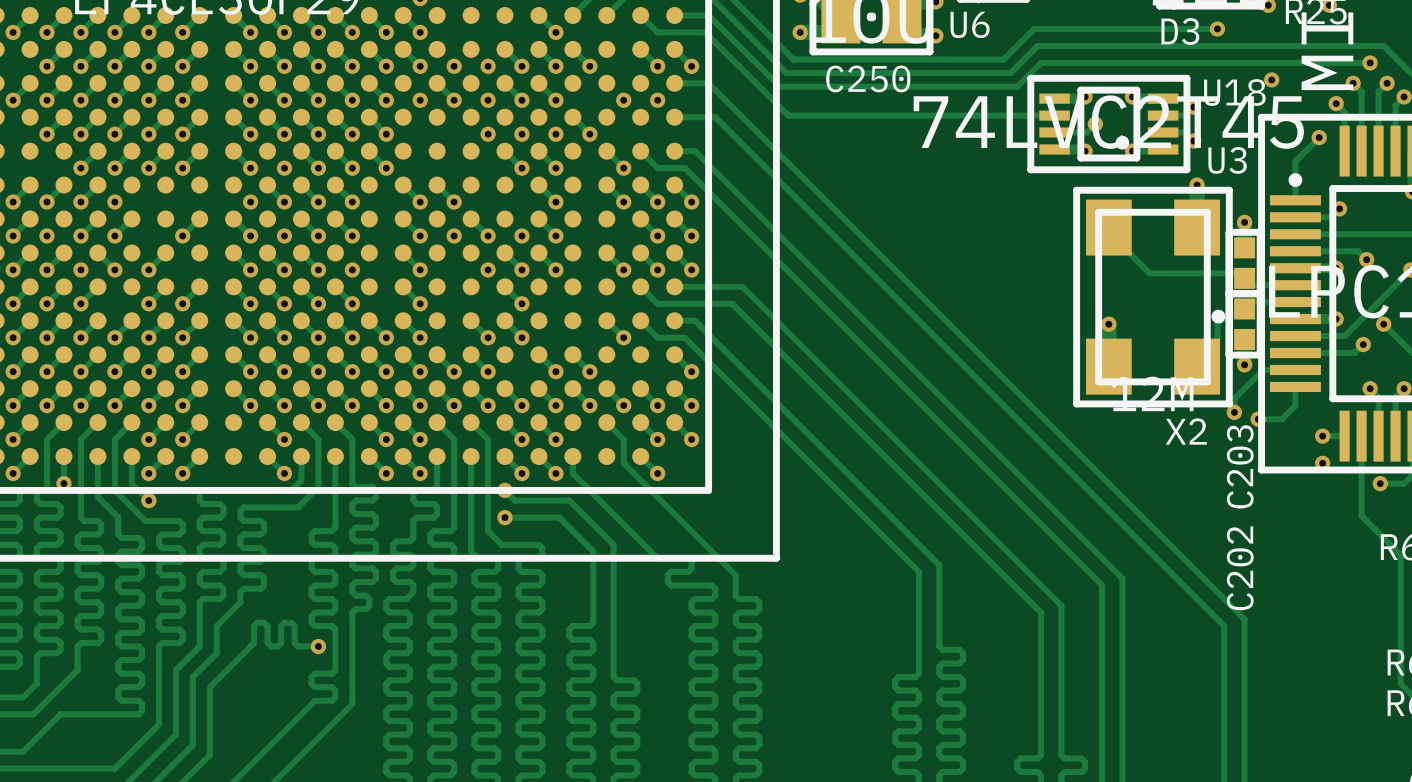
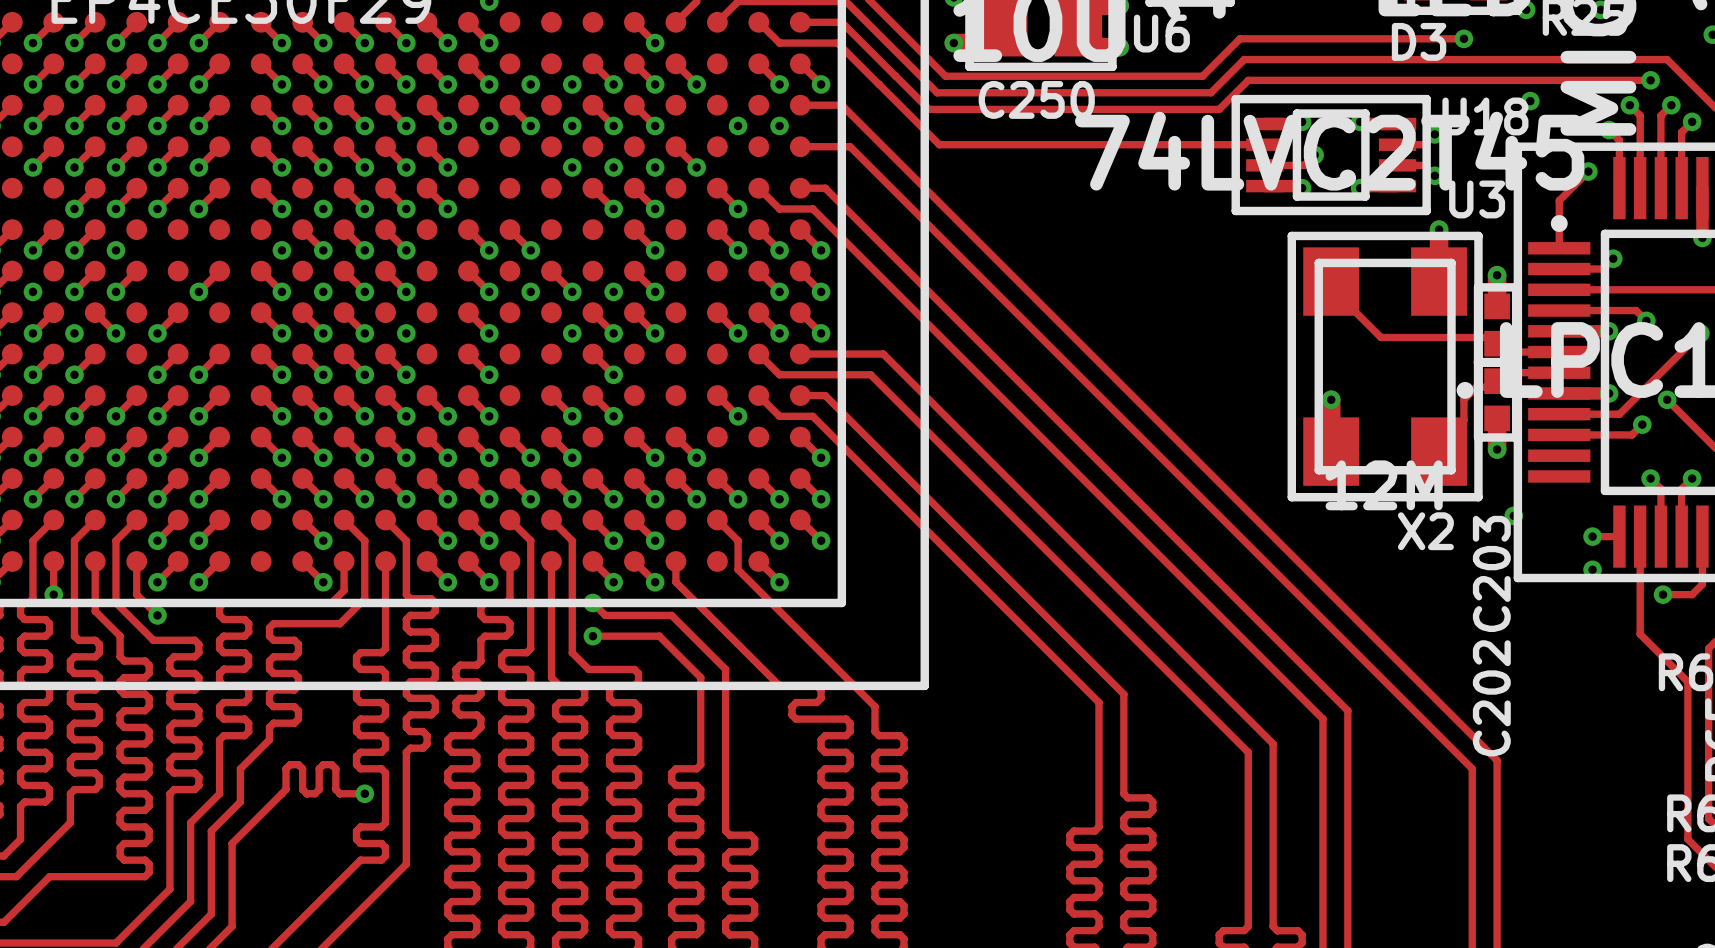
track: (1295, 369) (1263, 369) (1234, 398) (1234, 412) -> none
track: (1295, 386) (1295, 405) (1281, 419) (1258, 419) -> none
via: (1234, 412) -> none

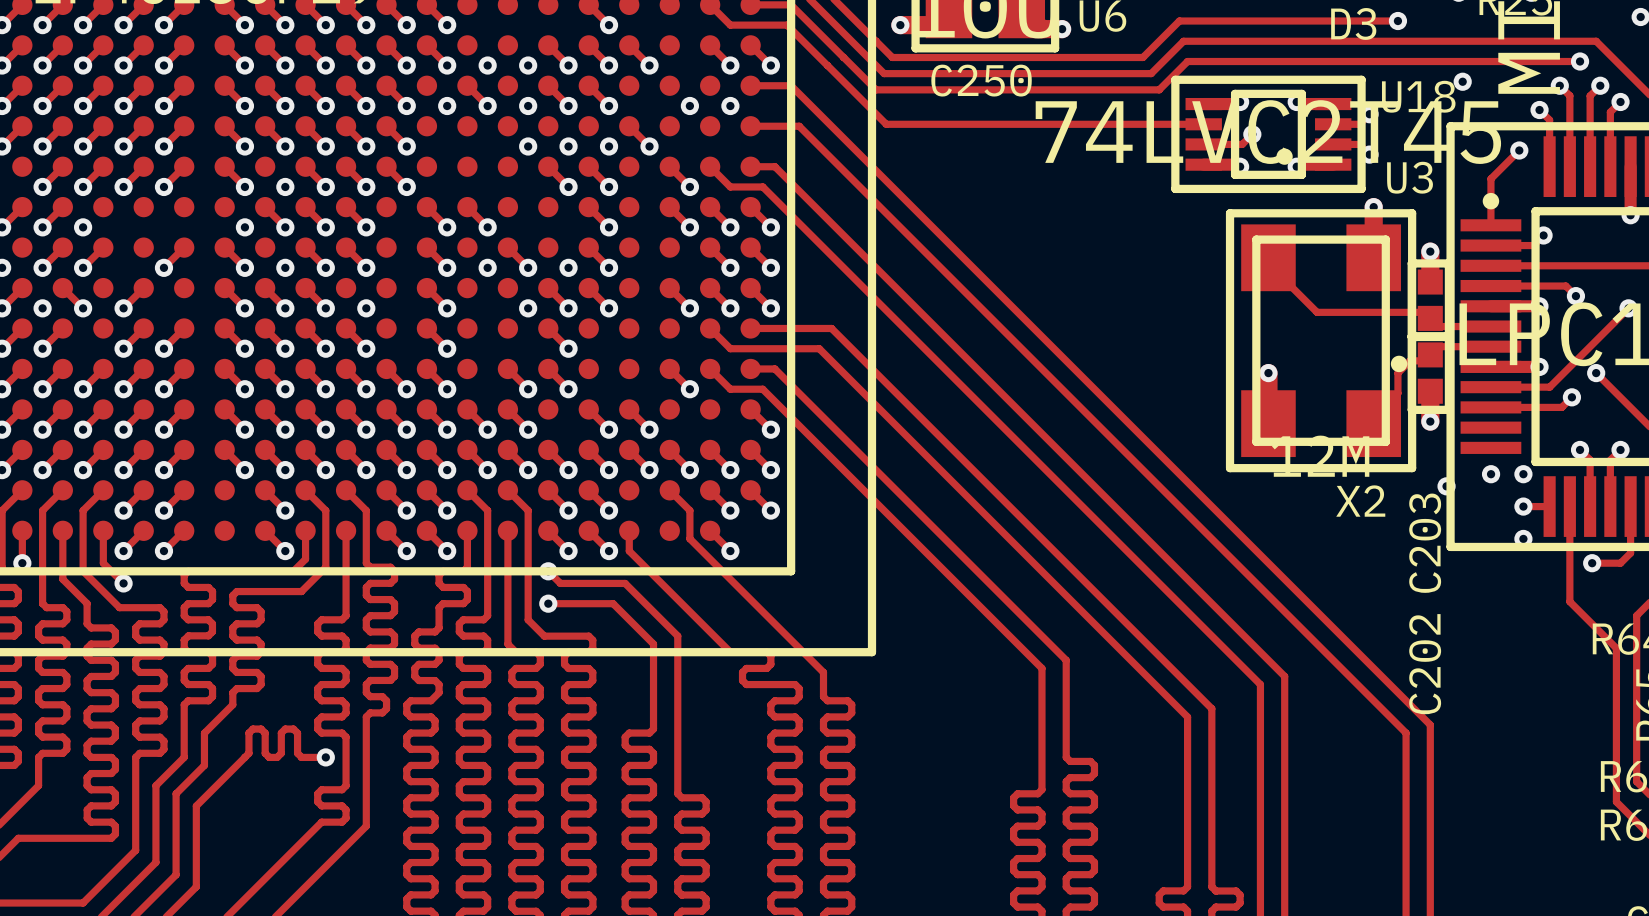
via: none -> (1491, 474)
via: none -> (1523, 474)

